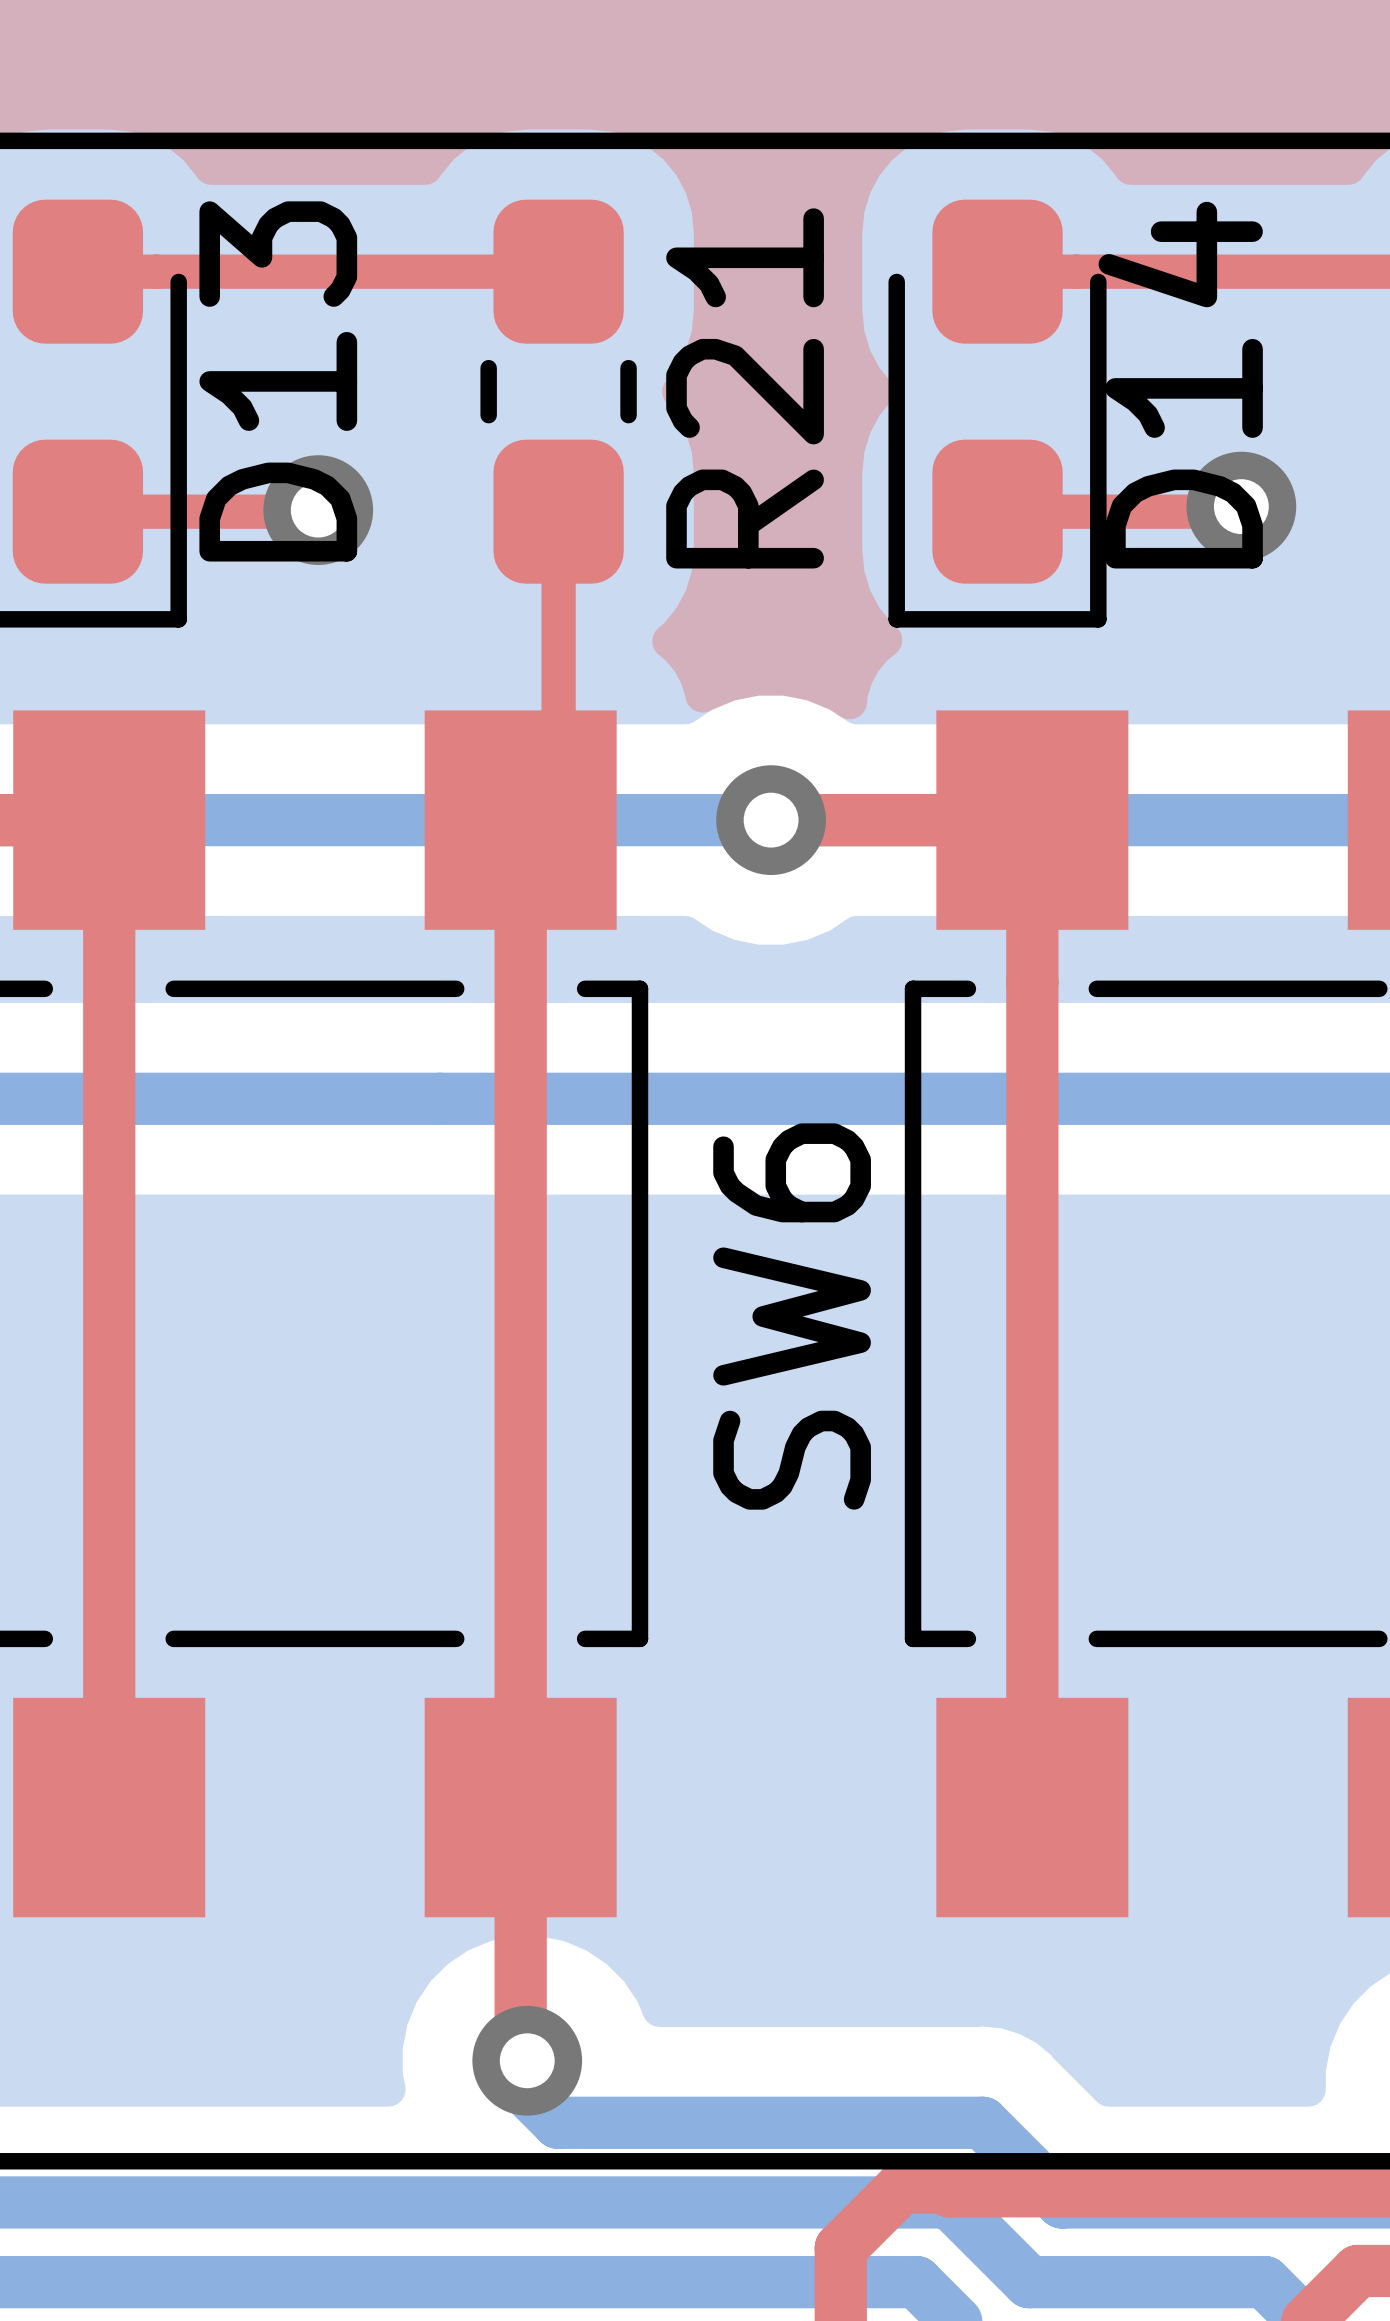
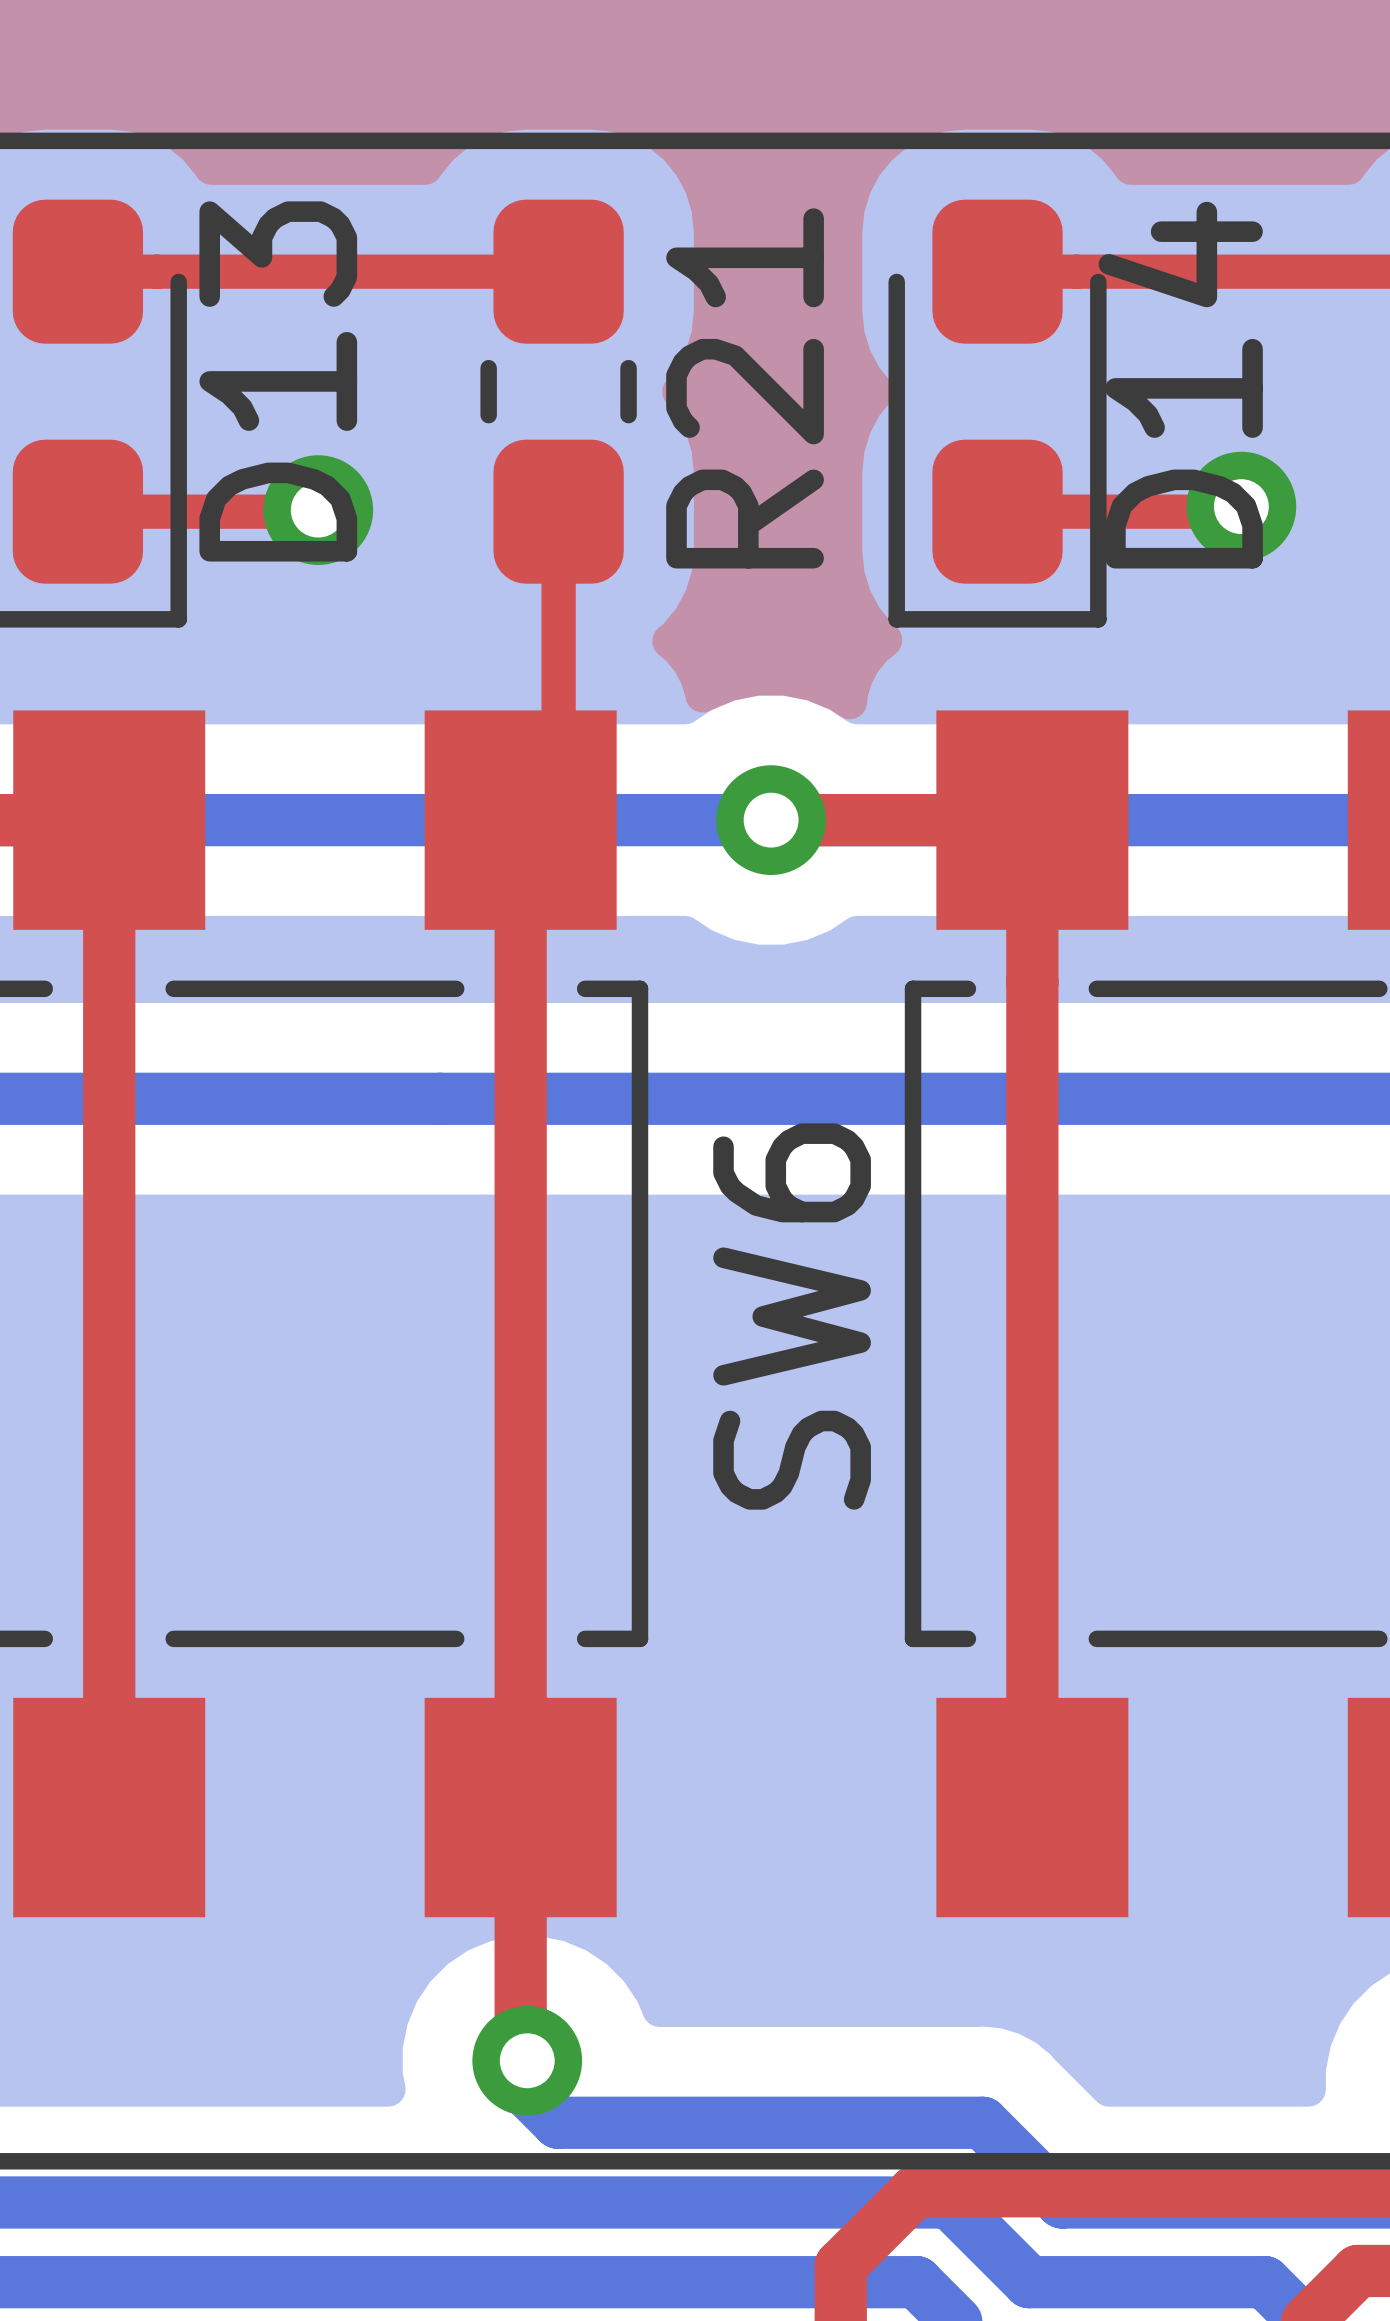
top track: (949, 2191) (945, 2187) (901, 2187) (840, 2248) (840, 2265) -> (949, 2191) (915, 2191) (840, 2265)

